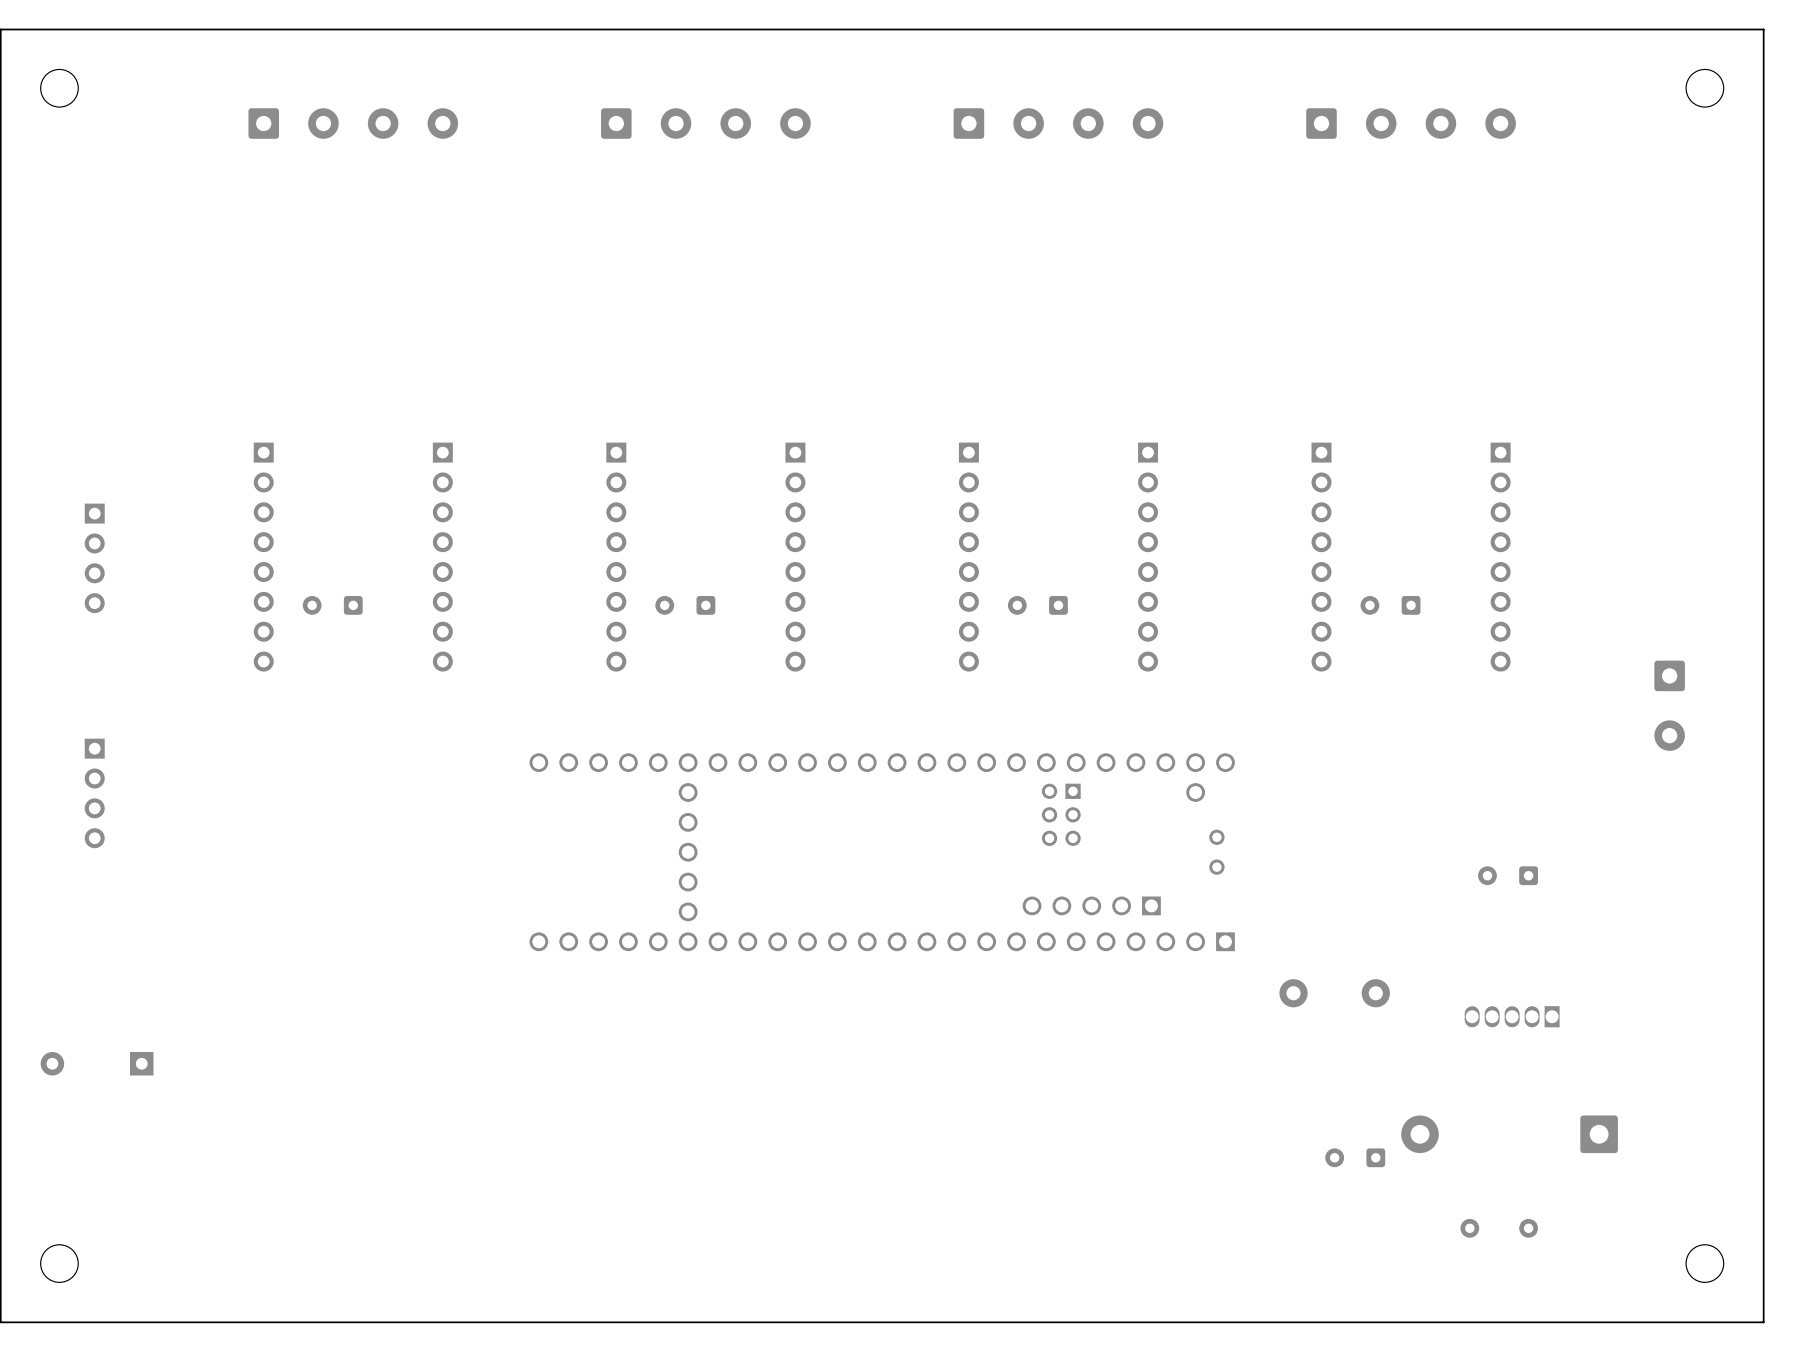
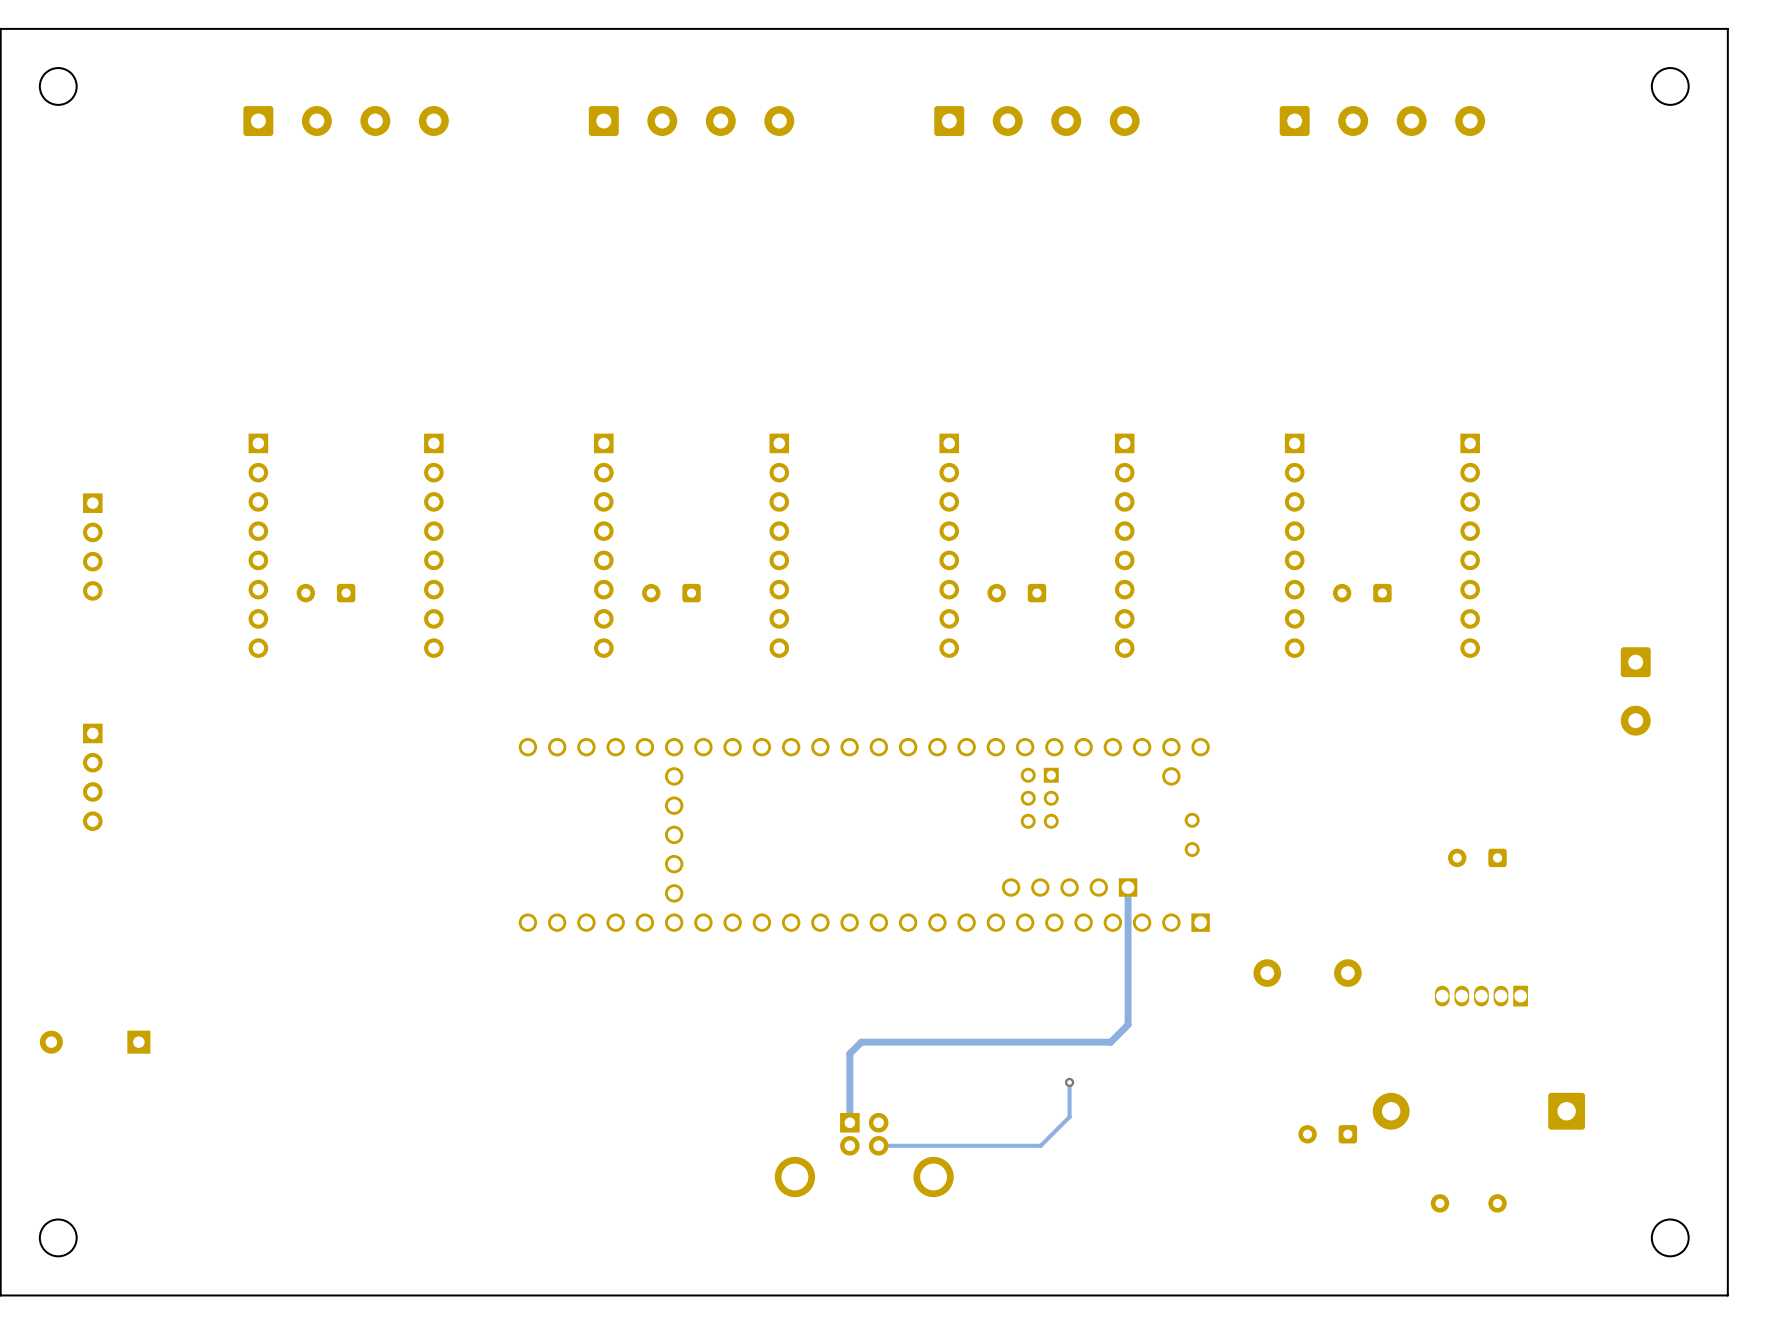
track: none -> (1128, 887) (1128, 1024) (1110, 1042) (861, 1042) (849, 1053) (849, 1122)
track: none -> (1069, 1082) (1069, 1117) (1040, 1145) (878, 1145)
via: none -> (1069, 1082)
part: none -> (864, 1155)

